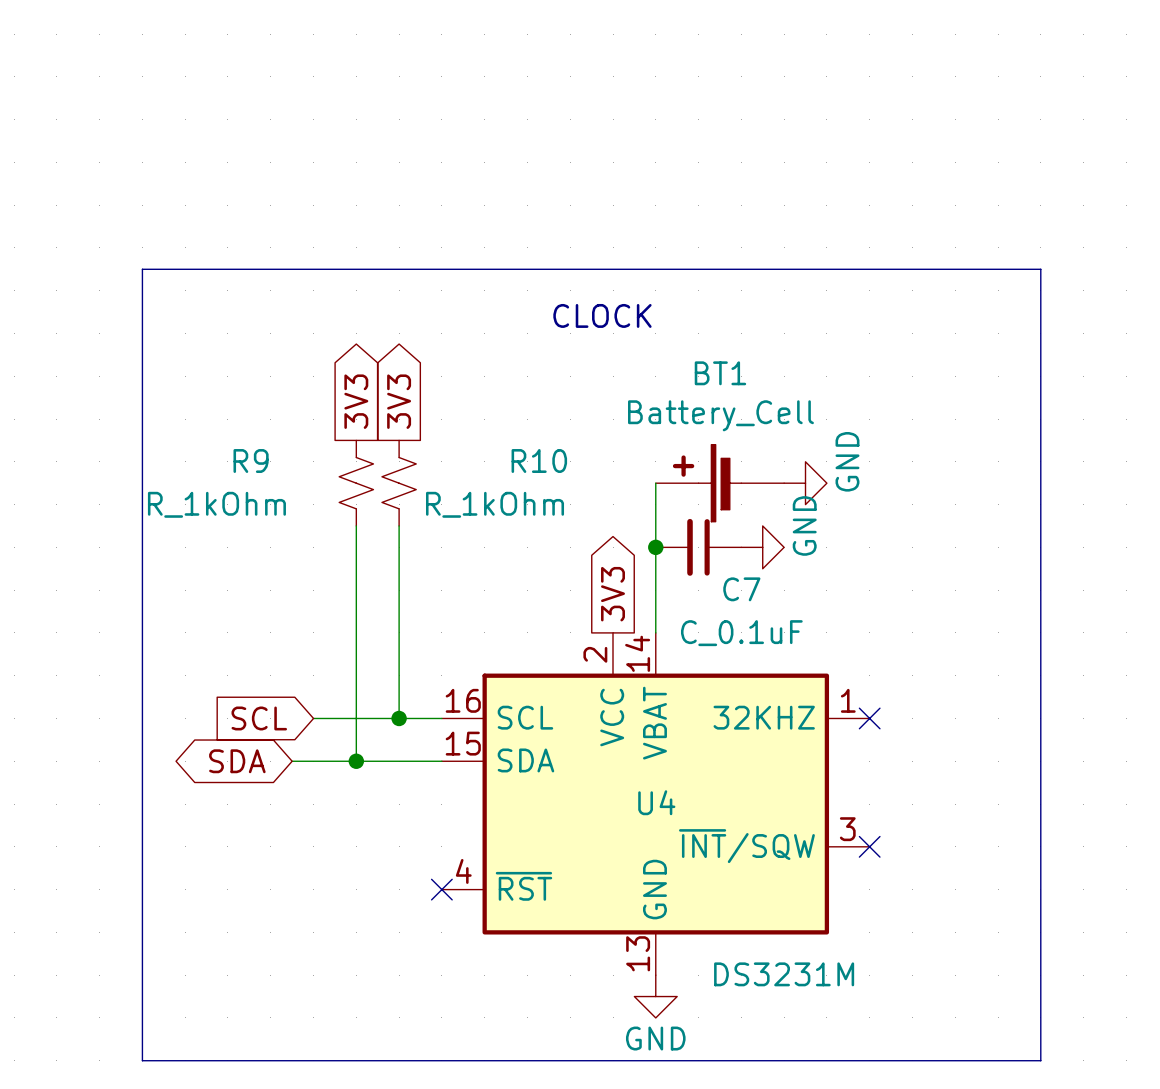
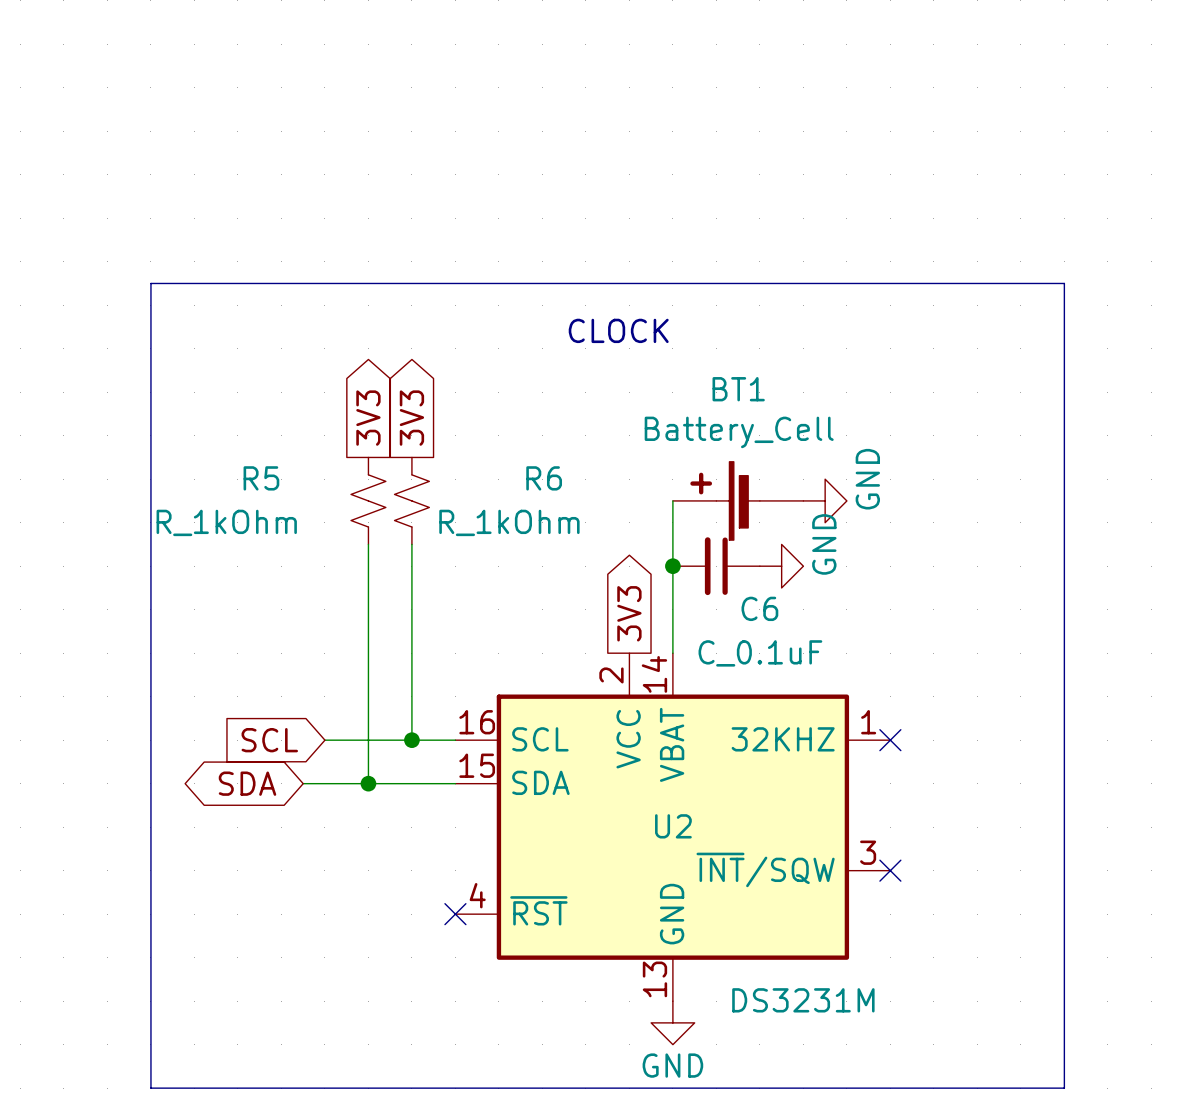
R9 name: R9 (251, 461) -> R5 (261, 478)
R10 name: R10 (539, 461) -> R6 (544, 478)
C7 name: C7 (741, 589) -> C6 (759, 608)
U4 name: U4 (656, 802) -> U2 (673, 826)

